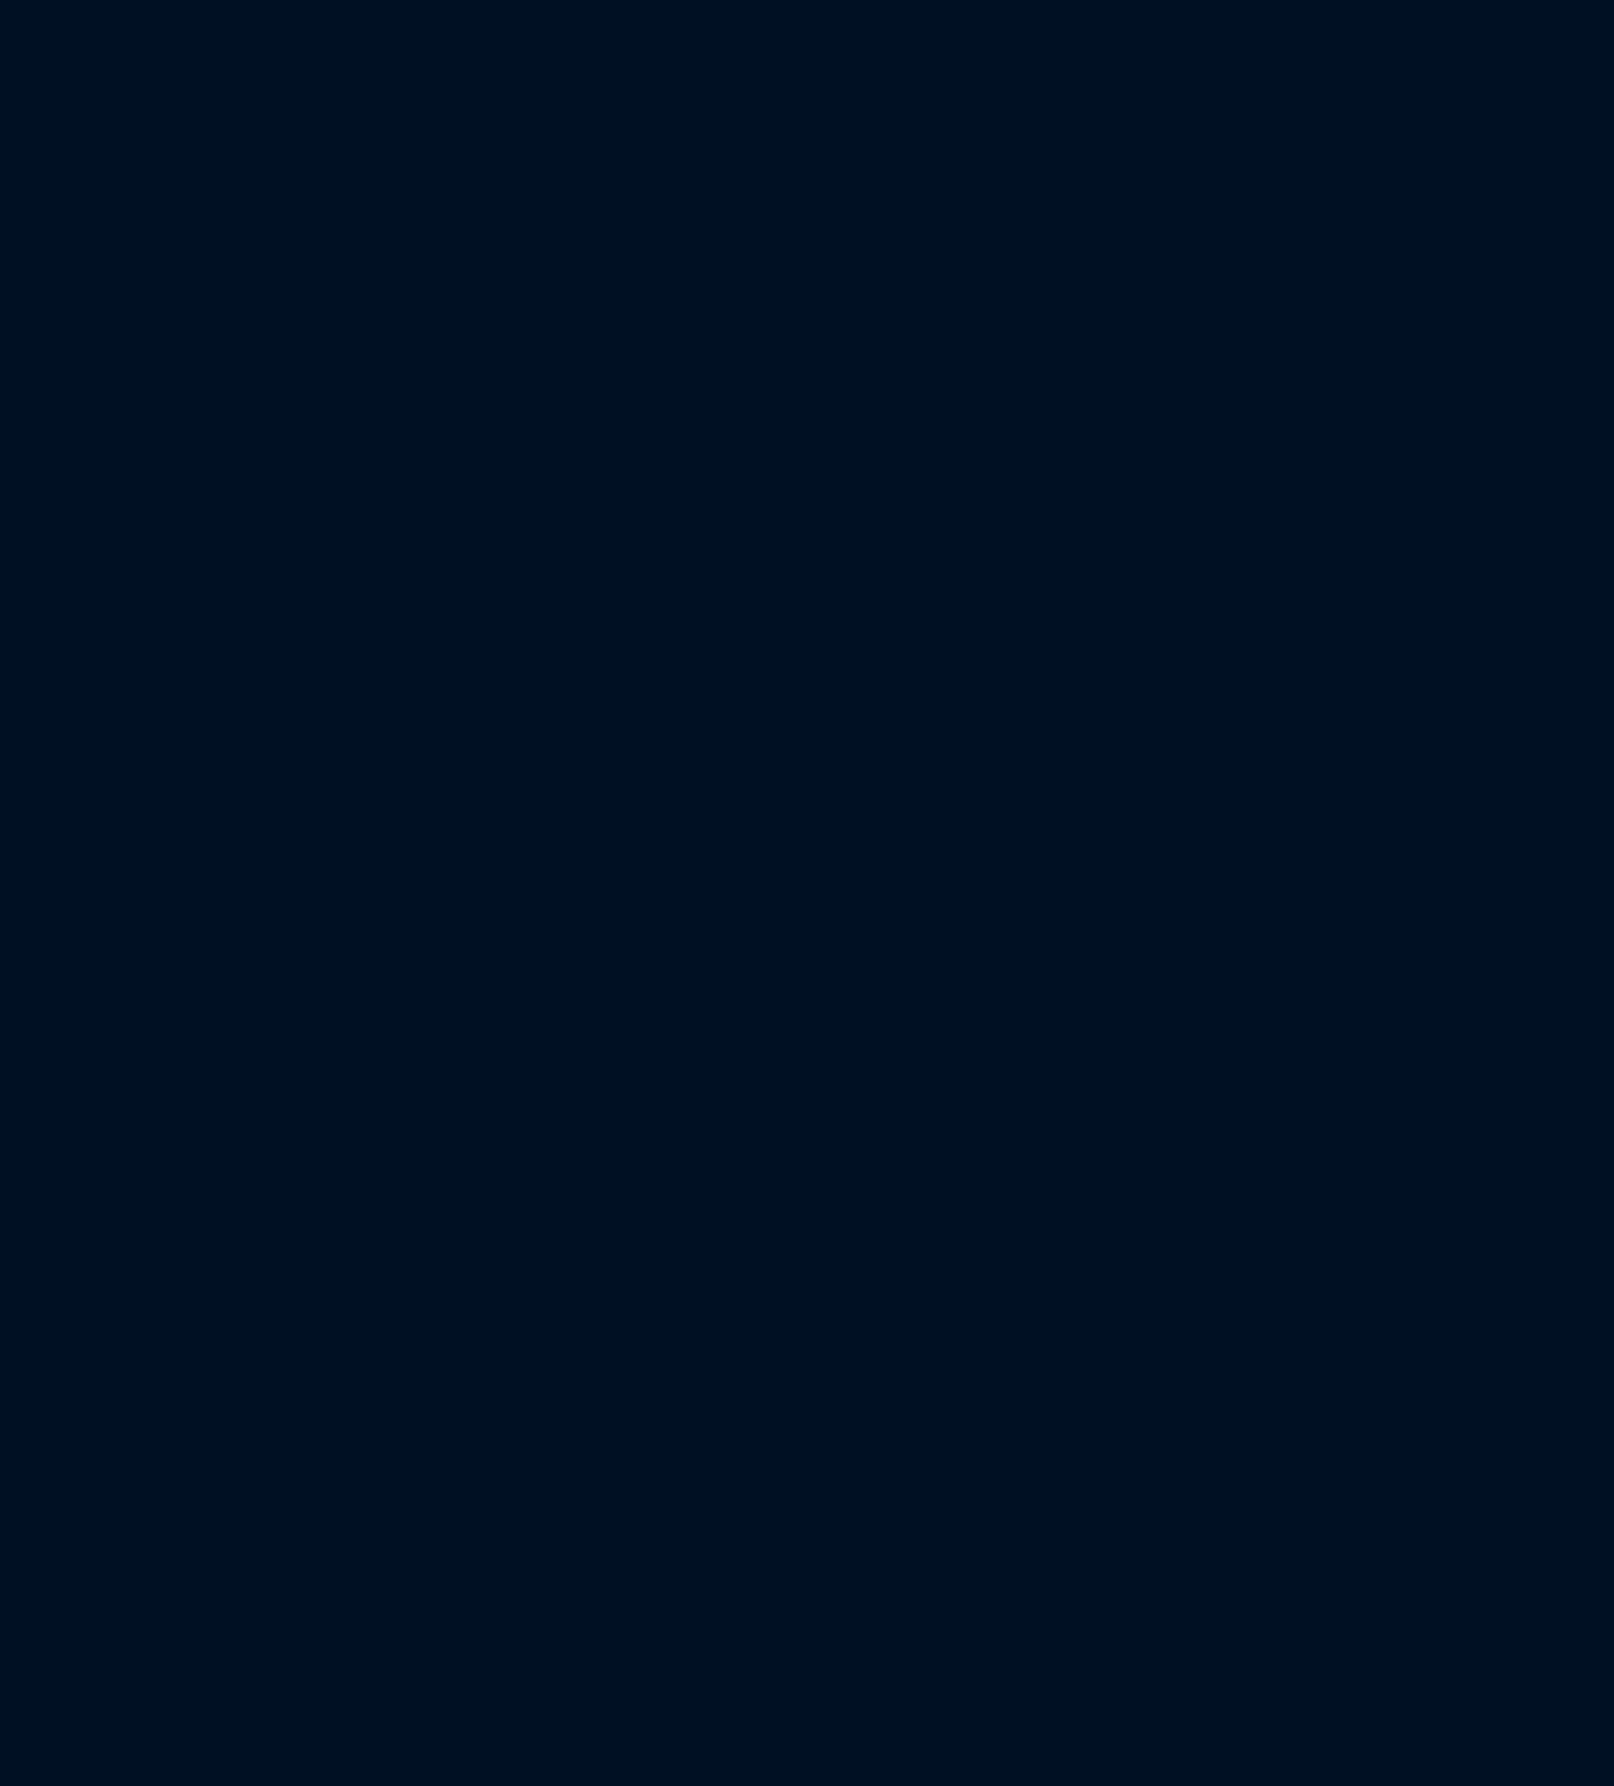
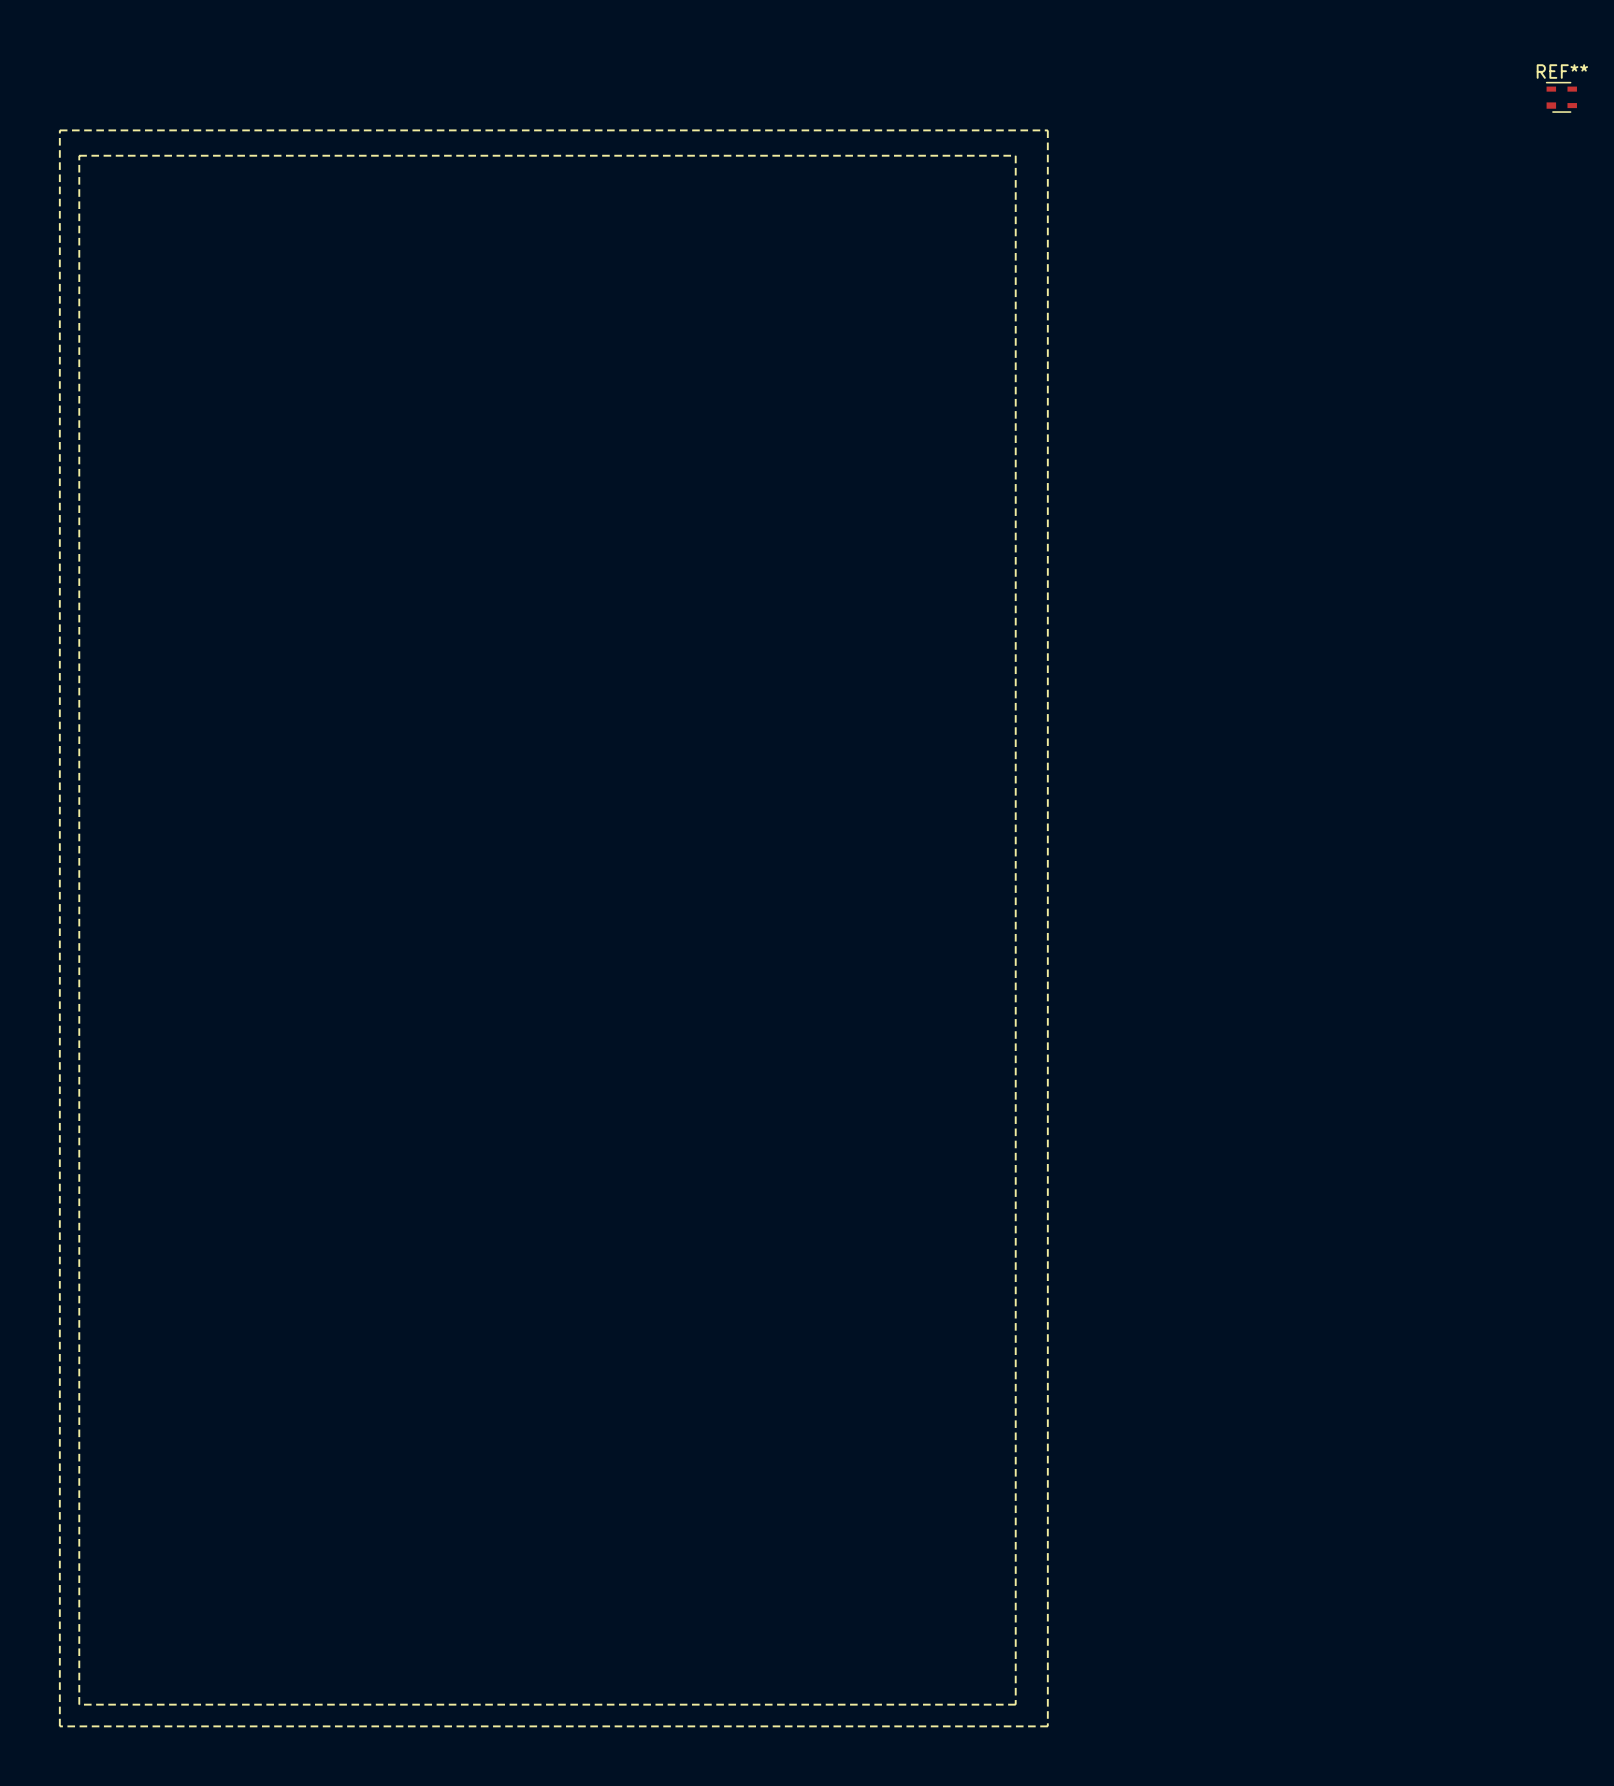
REF**: none -> (1561, 97)
line: none -> (59, 130) (1047, 130) (1047, 1726) (59, 1726) (59, 130)
line: none -> (79, 155) (1015, 155) (1015, 1704) (79, 1704) (79, 155)

